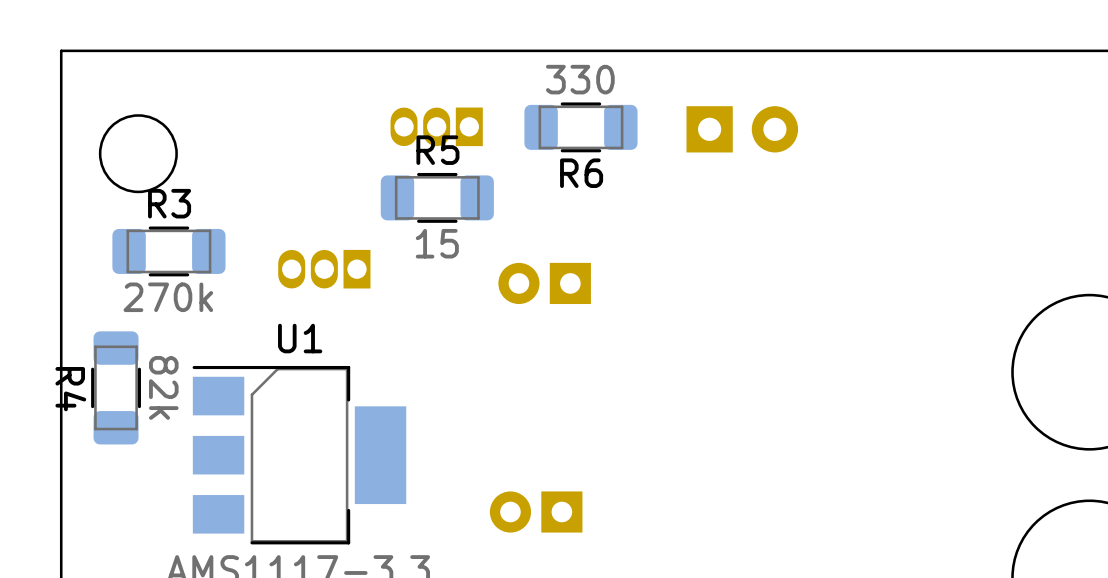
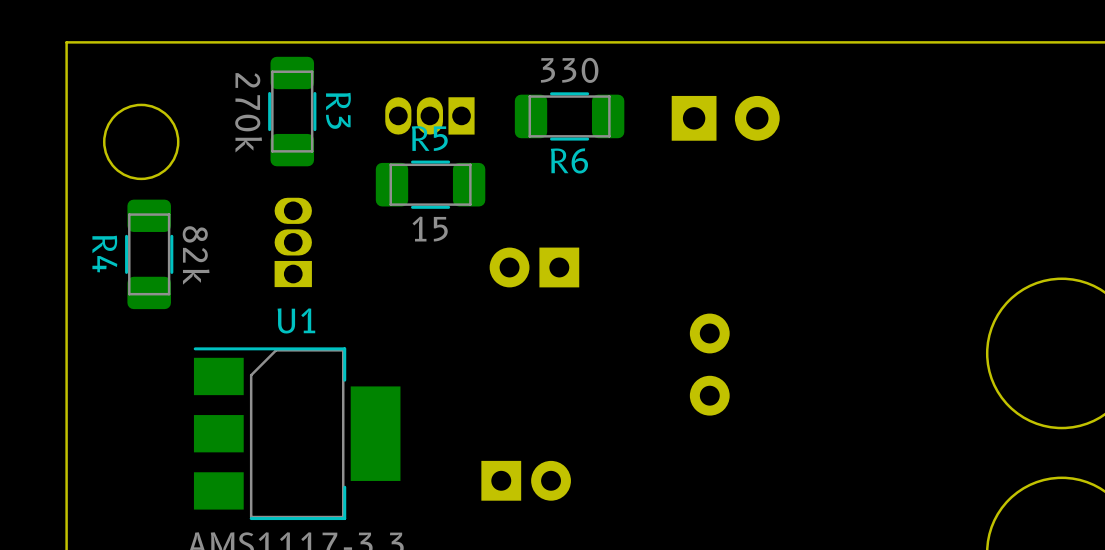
R3 rotation: 0° (168, 251) -> 90° clockwise (292, 111)
R3 position: (168, 251) -> (292, 111)
part rotation: 0° (324, 269) -> 90° clockwise (293, 242)
part: none -> (709, 364)
R4 position: (116, 387) -> (149, 254)
part rotation: 0° (536, 512) -> 180° (526, 480)

